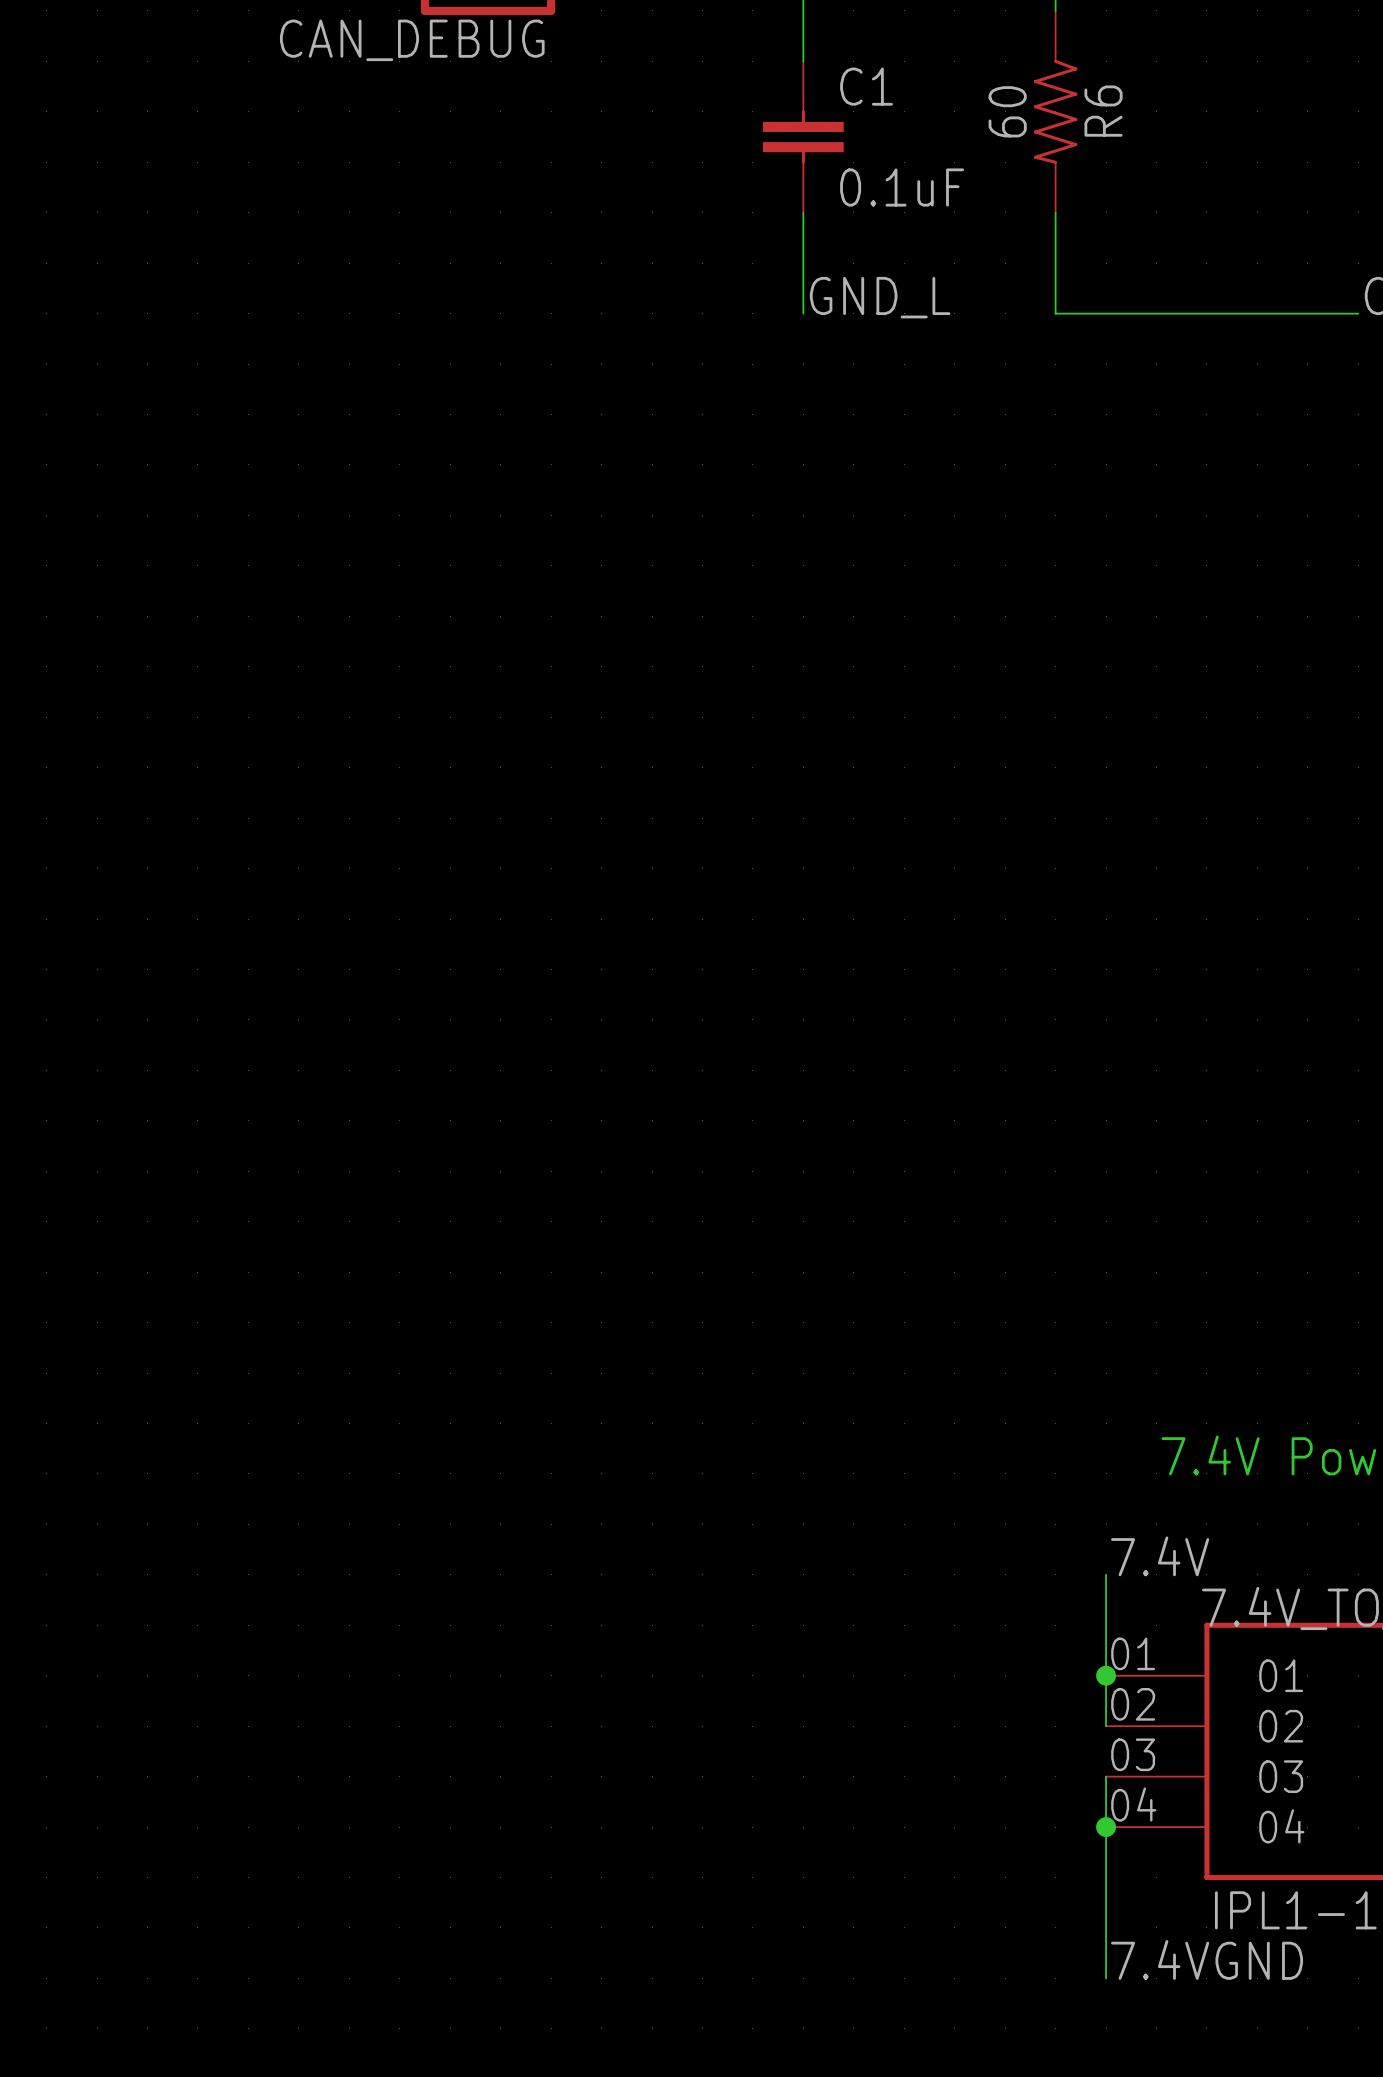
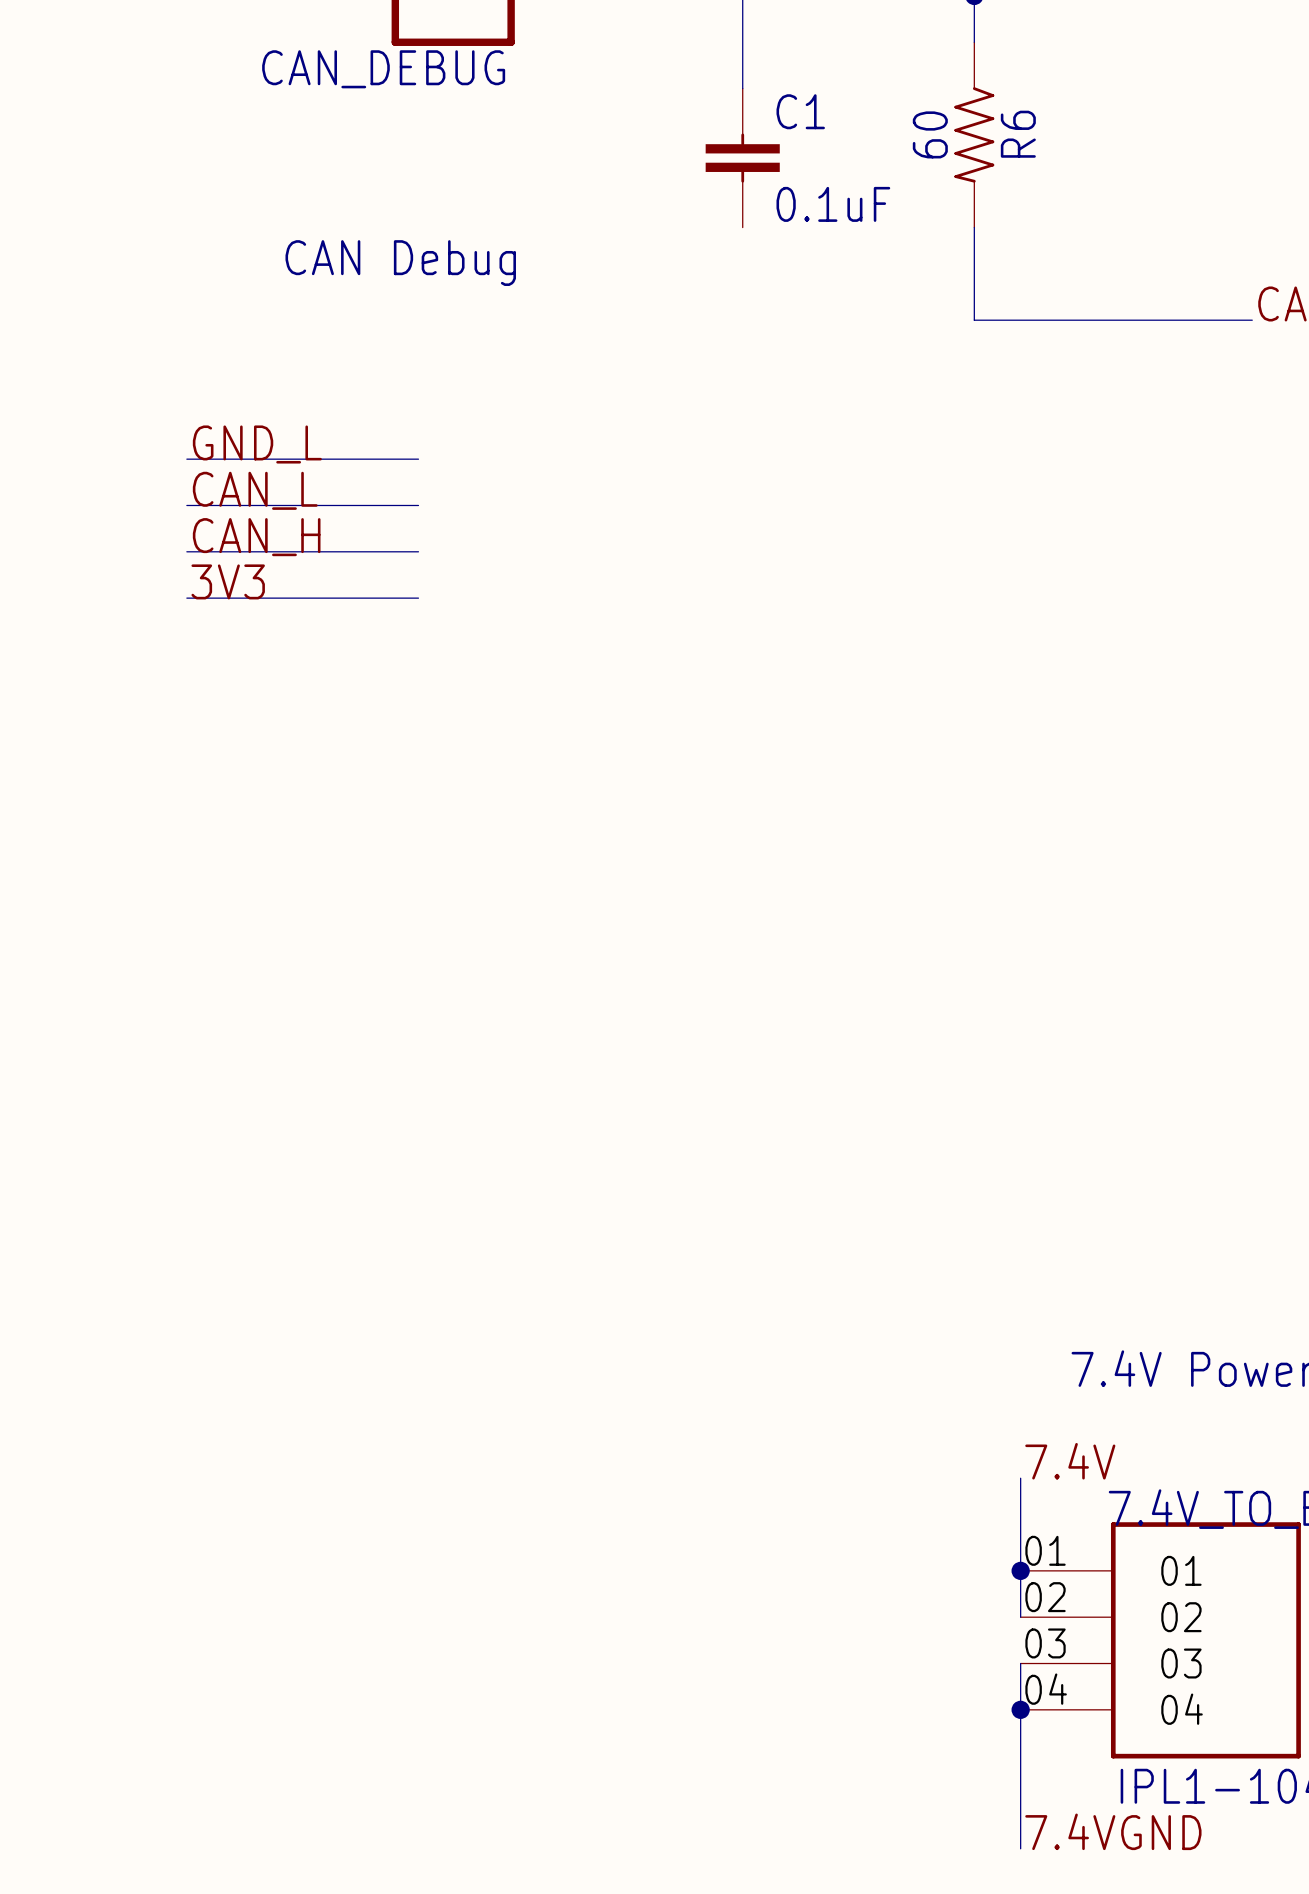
wire: (803, 212) (803, 313) -> none
text: none -> CAN Debug (400, 263)
label: GND_L (880, 297) -> none
label: none -> GND_L (257, 444)
wire: none -> (186, 459) (418, 459)
label: none -> CAN_L (255, 490)
wire: none -> (186, 505) (418, 505)
label: none -> CAN_H (256, 537)
wire: none -> (186, 551) (418, 551)
label: none -> 3V3 (228, 581)
wire: none -> (186, 598) (418, 598)

